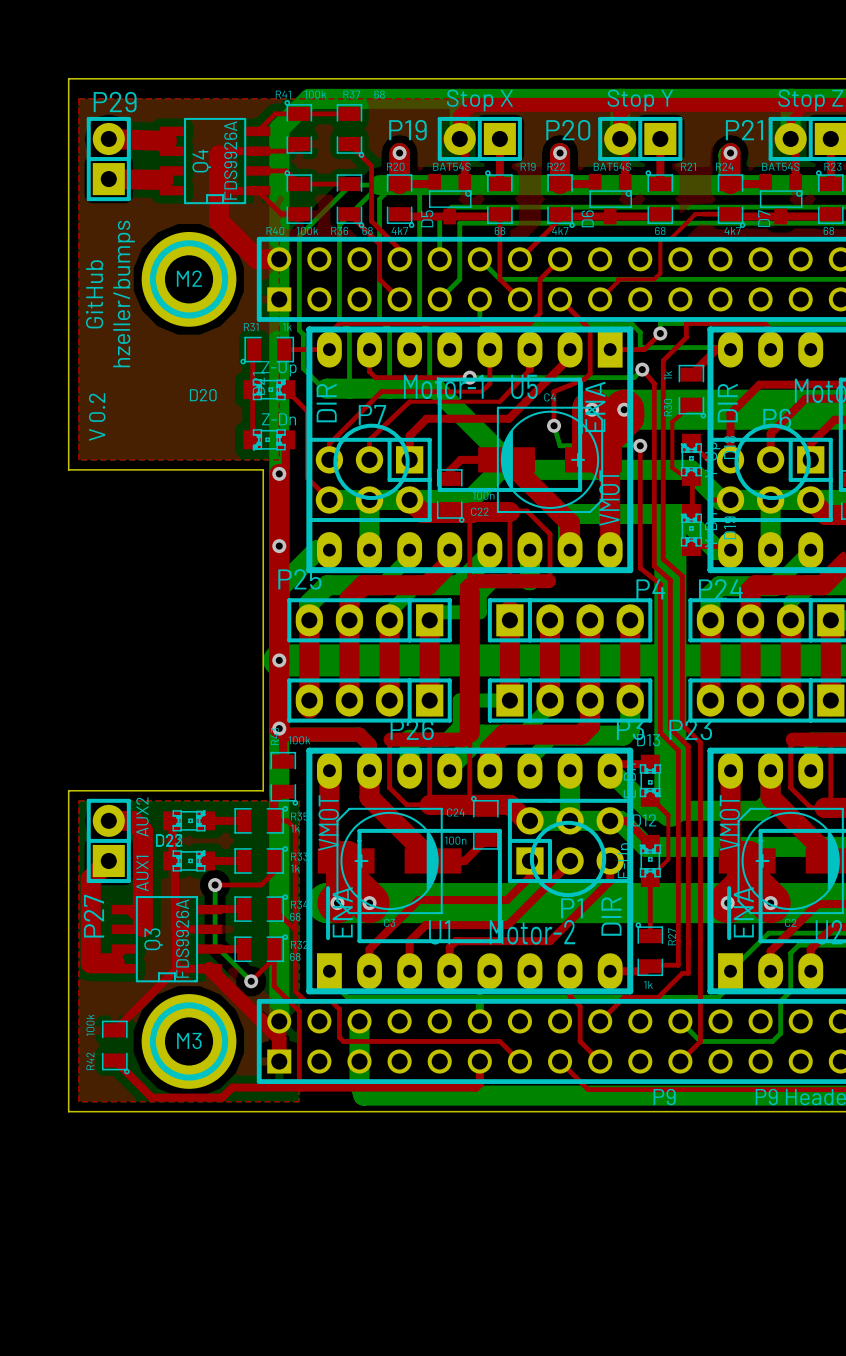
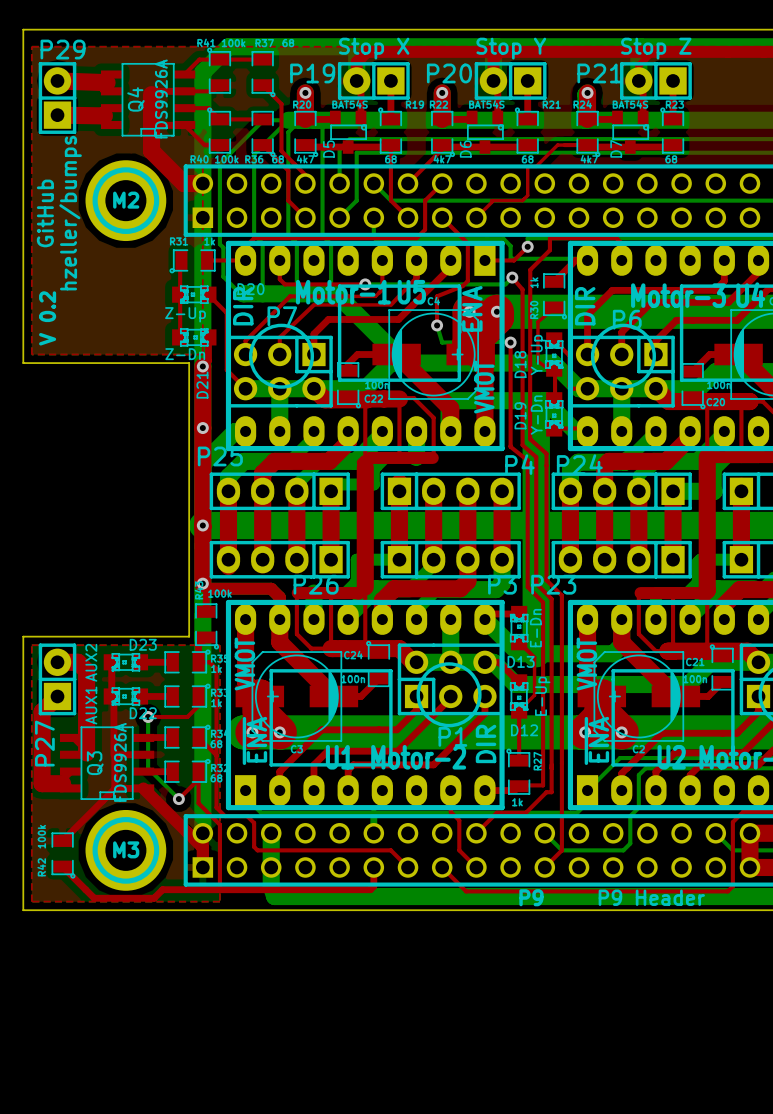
D20 rotation: 0° (269, 389) -> 180° (194, 294)
D21 rotation: 0° (269, 439) -> 180° (194, 337)
D18 rotation: 0° (691, 459) -> 180° (554, 354)
D19 rotation: 0° (691, 530) -> 180° (554, 414)
D13 rotation: 0° (650, 780) -> 180° (519, 628)
D23 rotation: 0° (189, 820) -> 180° (125, 662)
D22 rotation: 0° (189, 860) -> 180° (125, 696)
D12 rotation: 0° (650, 860) -> 180° (519, 696)

